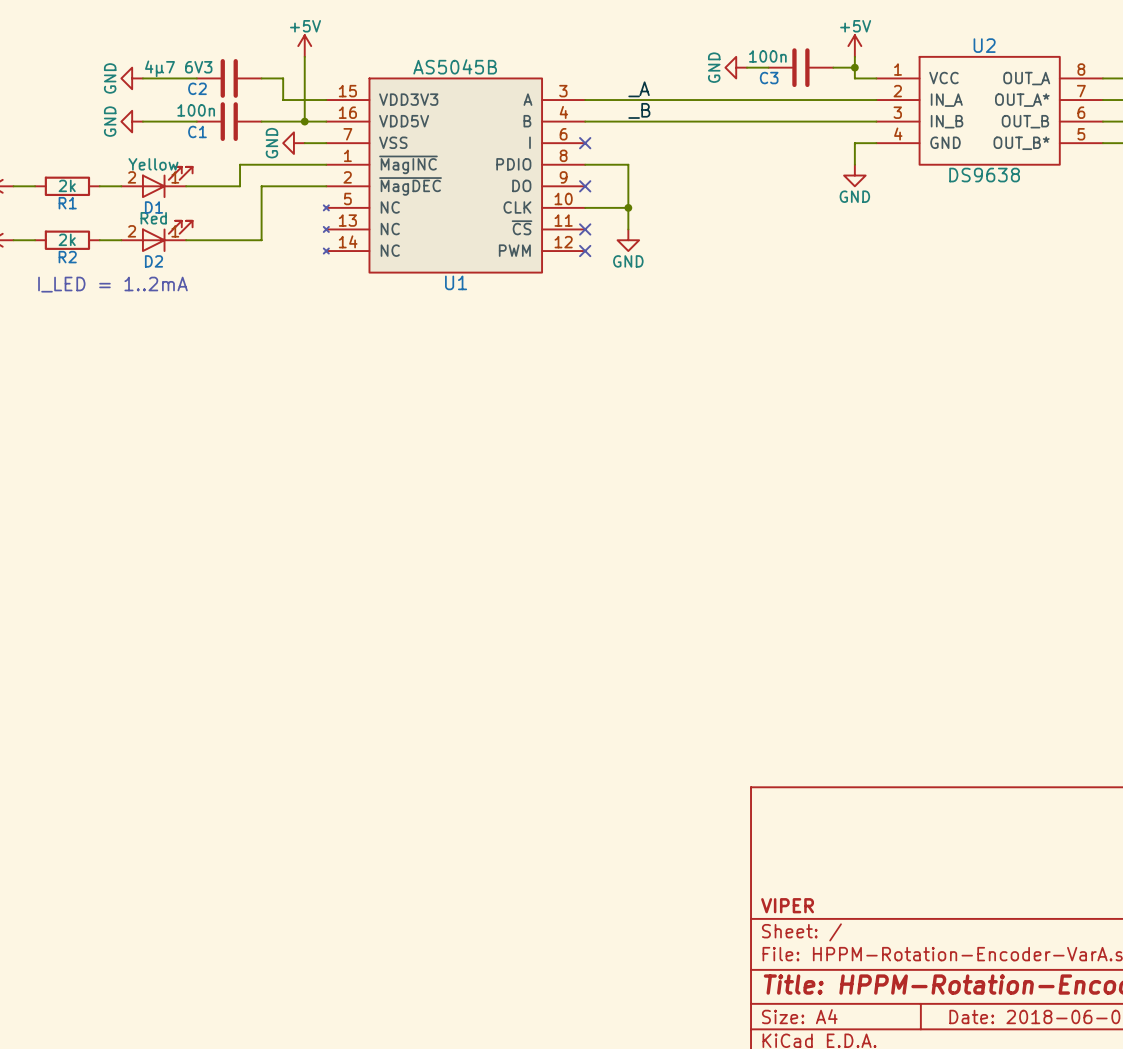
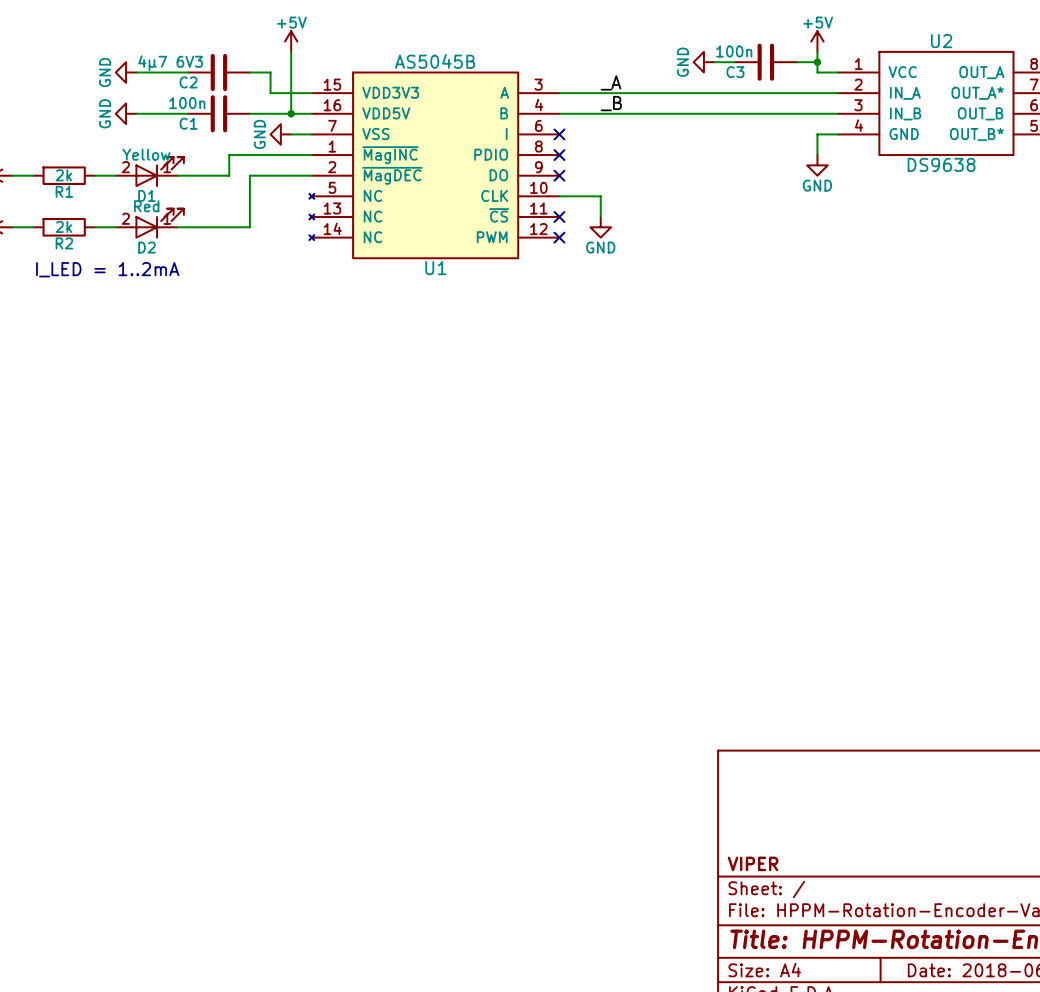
wire: (585, 164) (628, 164) (628, 207) -> none
no-connect mark: none -> (559, 155)
junction: (628, 207) -> none

